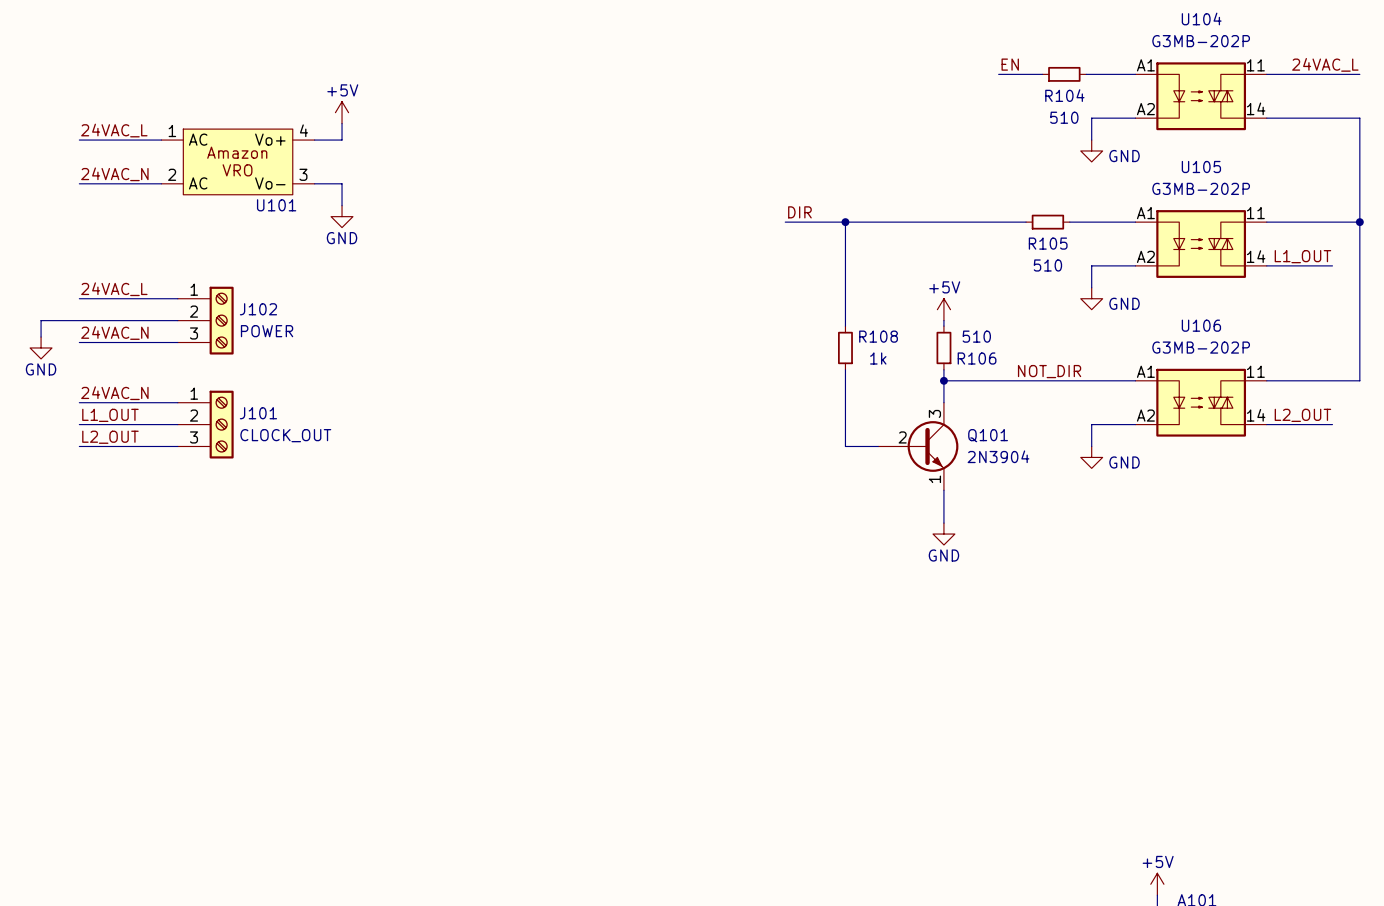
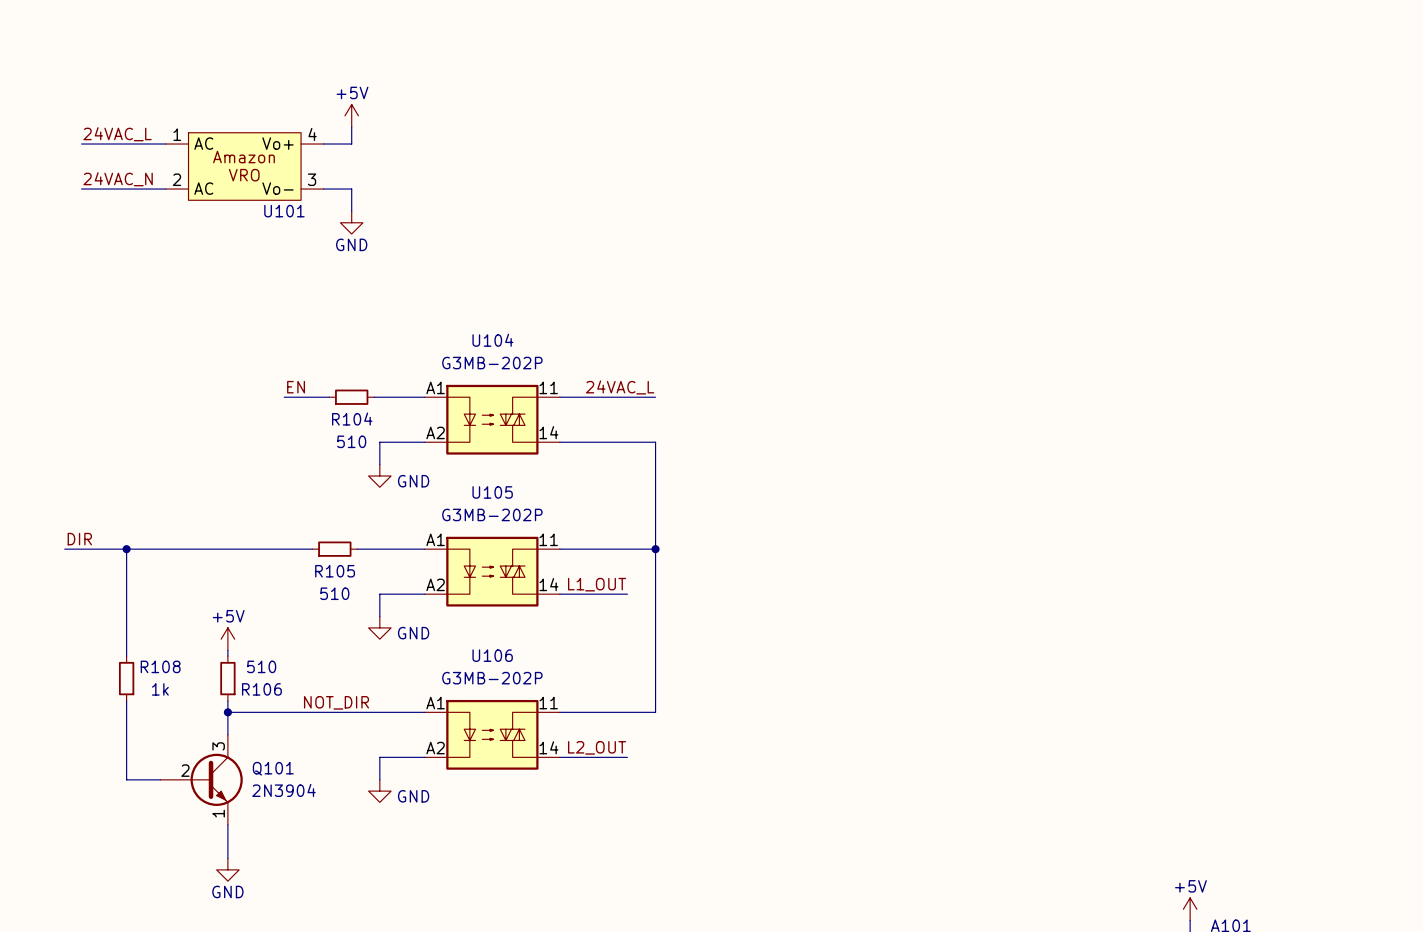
label: EN (1010, 64) -> none
label: 24VAC_L (1325, 64) -> none
wire: (998, 74) (1042, 74) -> none
R104 position: (1064, 74) -> (351, 397)
wire: (1086, 74) (1135, 74) -> none
wire: (1266, 74) (1359, 74) -> none
U104 position: (1201, 96) -> (492, 419)
wire: (1135, 118) (1091, 118) (1091, 140) -> none
wire: (1266, 118) (1359, 118) (1359, 380) (1266, 380) -> none
power symbol: GND (1091, 150) -> none
label: DIR (799, 212) -> none
wire: (785, 222) (1026, 222) -> none
wire: (845, 222) (845, 326) -> none
junction: (845, 222) -> none
R105 position: (1047, 222) -> (334, 549)
wire: (1069, 222) (1135, 222) -> none
wire: (1266, 222) (1359, 222) -> none
junction: (1359, 222) -> none
U105 position: (1201, 244) -> (492, 571)
label: L1_OUT (1302, 256) -> none
wire: (1135, 265) (1091, 265) (1091, 287) -> none
wire: (1266, 265) (1332, 265) -> none
label: 24VAC_L (114, 289) -> none
wire: (79, 298) (177, 298) -> none
power symbol: GND (1091, 298) -> none
power symbol: +5V (943, 309) -> none
wire: (177, 320) (41, 320) (41, 337) -> none
J102: POWER (205, 320) -> none
wire: (943, 320) (943, 326) -> none
label: 24VAC_N (114, 333) -> none
wire: (79, 342) (177, 342) -> none
power symbol: GND (41, 347) -> none
R108 position: (845, 347) -> (126, 678)
R106 position: (943, 347) -> (227, 678)
wire: (845, 369) (845, 446) (878, 446) -> none
wire: (943, 369) (943, 402) -> none
label: NOT_DIR (1049, 371) -> none
label: none -> EN (296, 387)
label: none -> 24VAC_L (620, 387)
wire: (943, 380) (1135, 380) -> none
junction: (943, 380) -> none
wire: none -> (284, 397) (329, 397)
wire: none -> (374, 397) (424, 397)
wire: none -> (559, 397) (655, 397)
label: 24VAC_N (114, 393) -> none
wire: (79, 402) (177, 402) -> none
U106 position: (1201, 402) -> (492, 734)
label: L1_OUT (110, 415) -> none
label: L2_OUT (1302, 415) -> none
wire: (79, 424) (177, 424) -> none
J101: CLOCK_OUT (205, 424) -> none
wire: (1135, 424) (1091, 424) (1091, 446) -> none
wire: (1266, 424) (1332, 424) -> none
wire: none -> (424, 442) (379, 442) (379, 464)
wire: none -> (559, 442) (655, 442) (655, 712) (559, 712)
label: L2_OUT (110, 437) -> none
wire: (79, 446) (177, 446) -> none
Q101 position: (918, 446) -> (201, 779)
power symbol: GND (1091, 457) -> none
power symbol: none -> GND (379, 476)
wire: (943, 490) (943, 523) -> none
label: none -> DIR (79, 539)
wire: none -> (64, 549) (312, 549)
wire: none -> (126, 549) (126, 656)
junction: none -> (126, 549)
wire: none -> (357, 549) (424, 549)
wire: none -> (559, 549) (655, 549)
junction: none -> (655, 549)
power symbol: GND (943, 534) -> none
label: none -> L1_OUT (597, 584)
wire: none -> (424, 594) (379, 594) (379, 616)
wire: none -> (559, 594) (627, 594)
power symbol: none -> GND (379, 627)
power symbol: none -> +5V (227, 639)
wire: none -> (227, 650) (227, 656)
wire: none -> (126, 701) (126, 779) (160, 779)
wire: none -> (227, 701) (227, 734)
label: none -> NOT_DIR (336, 702)
wire: none -> (227, 712) (424, 712)
junction: none -> (227, 712)
label: none -> L2_OUT (597, 747)
wire: none -> (424, 757) (379, 757) (379, 779)
wire: none -> (559, 757) (627, 757)
power symbol: none -> GND (379, 791)
wire: none -> (227, 824) (227, 858)
power symbol: none -> GND (227, 869)

